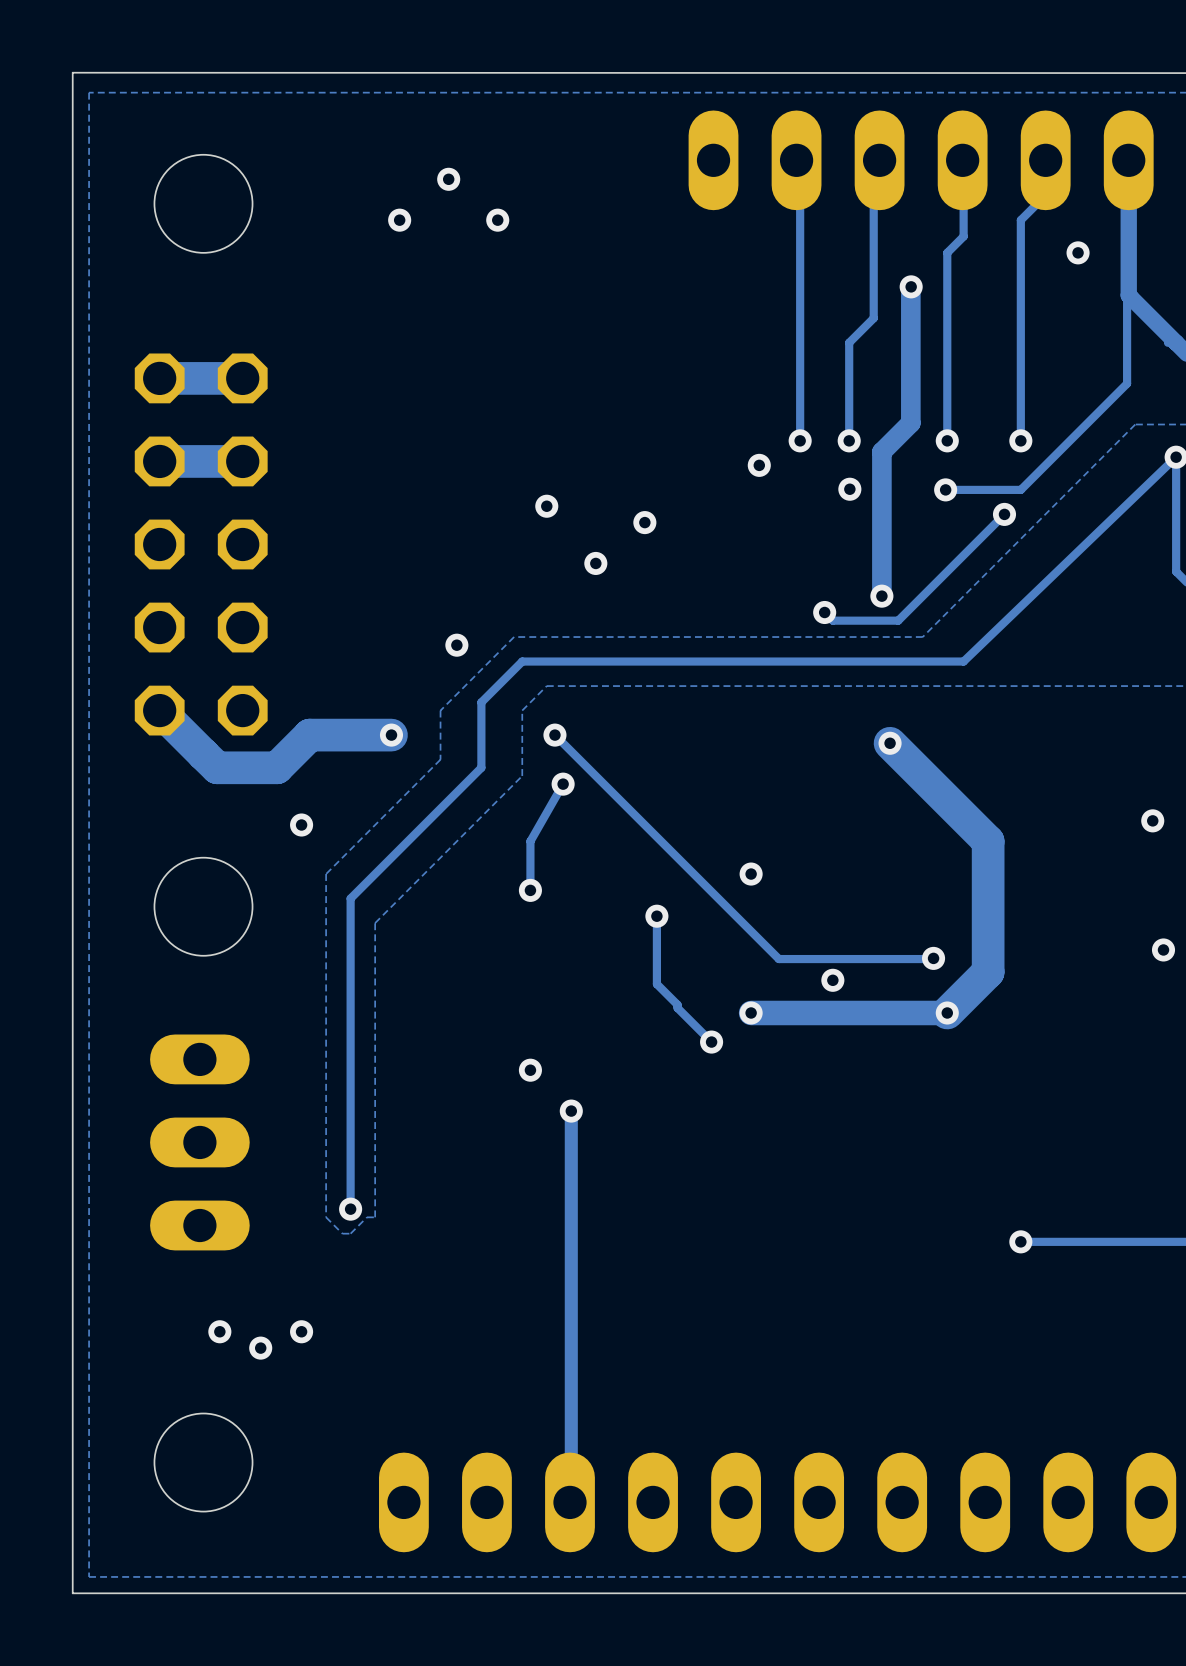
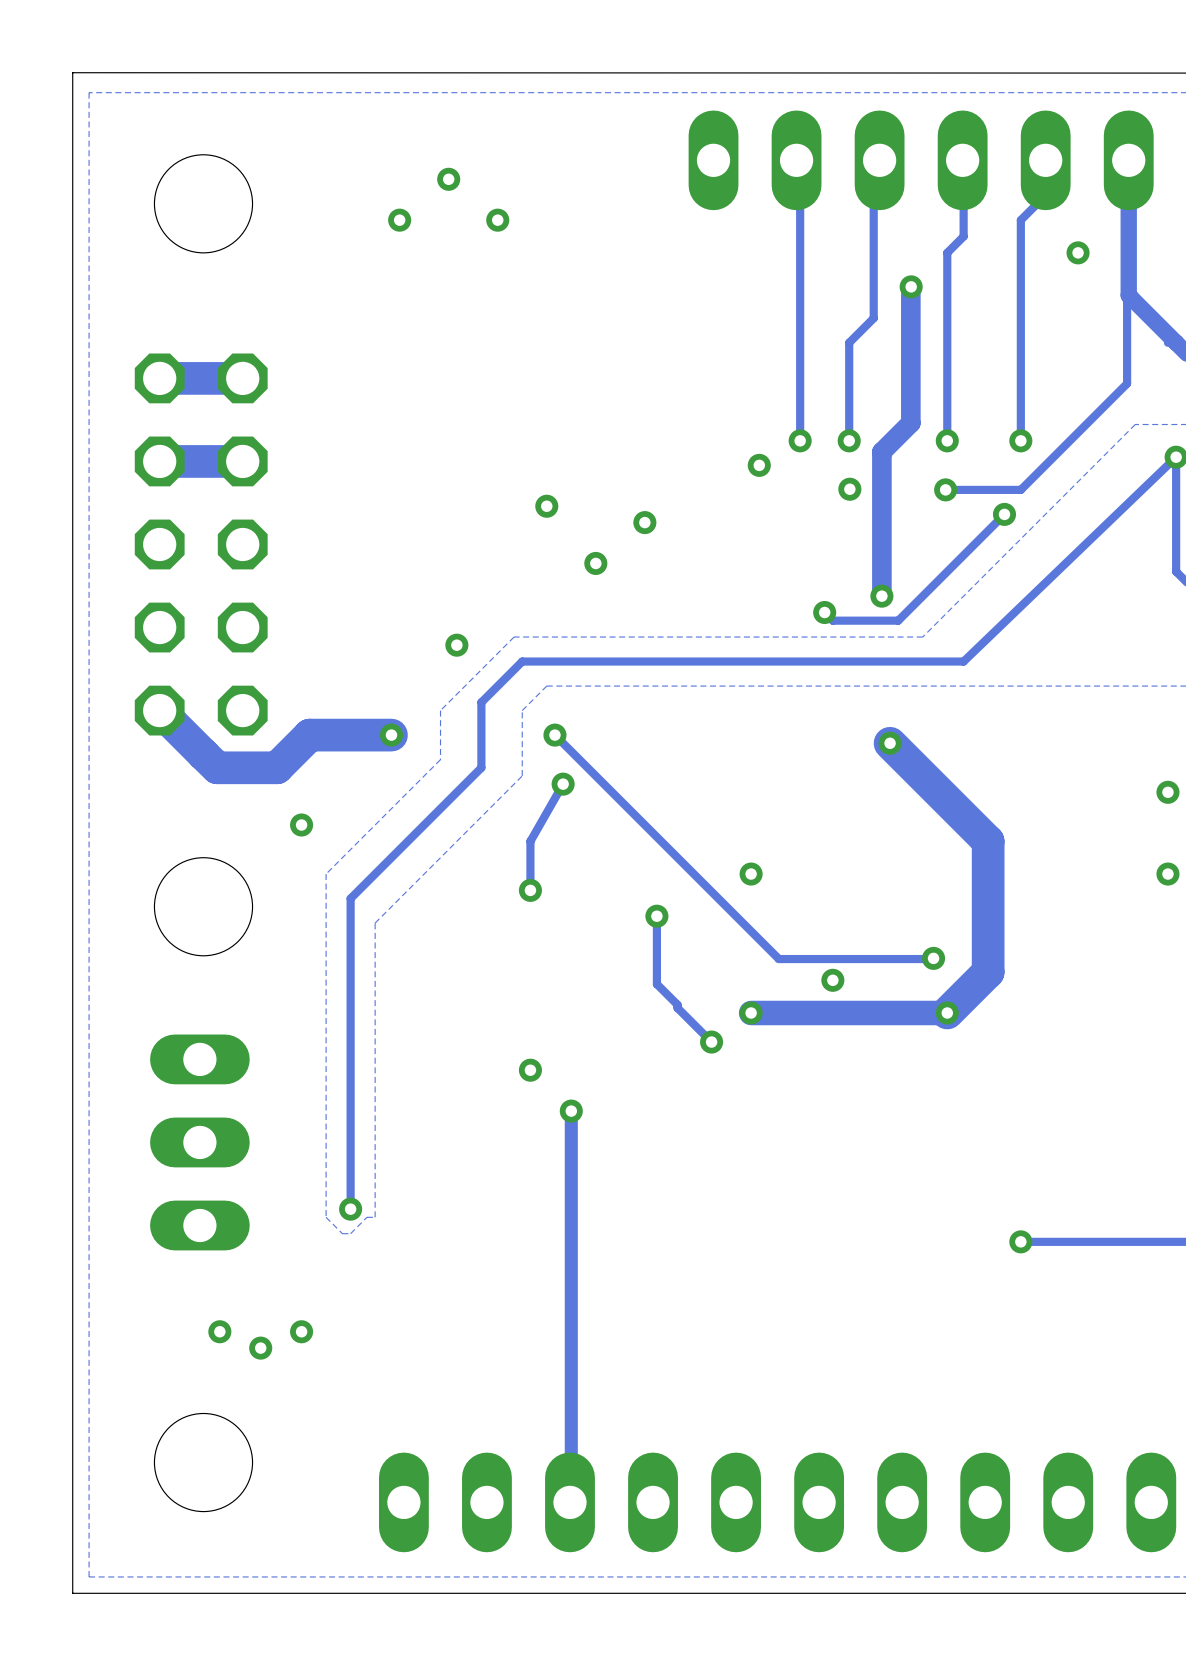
via: none -> (1167, 792)
via: (1152, 820) -> none
via: none -> (1167, 874)
via: (1163, 949) -> none

